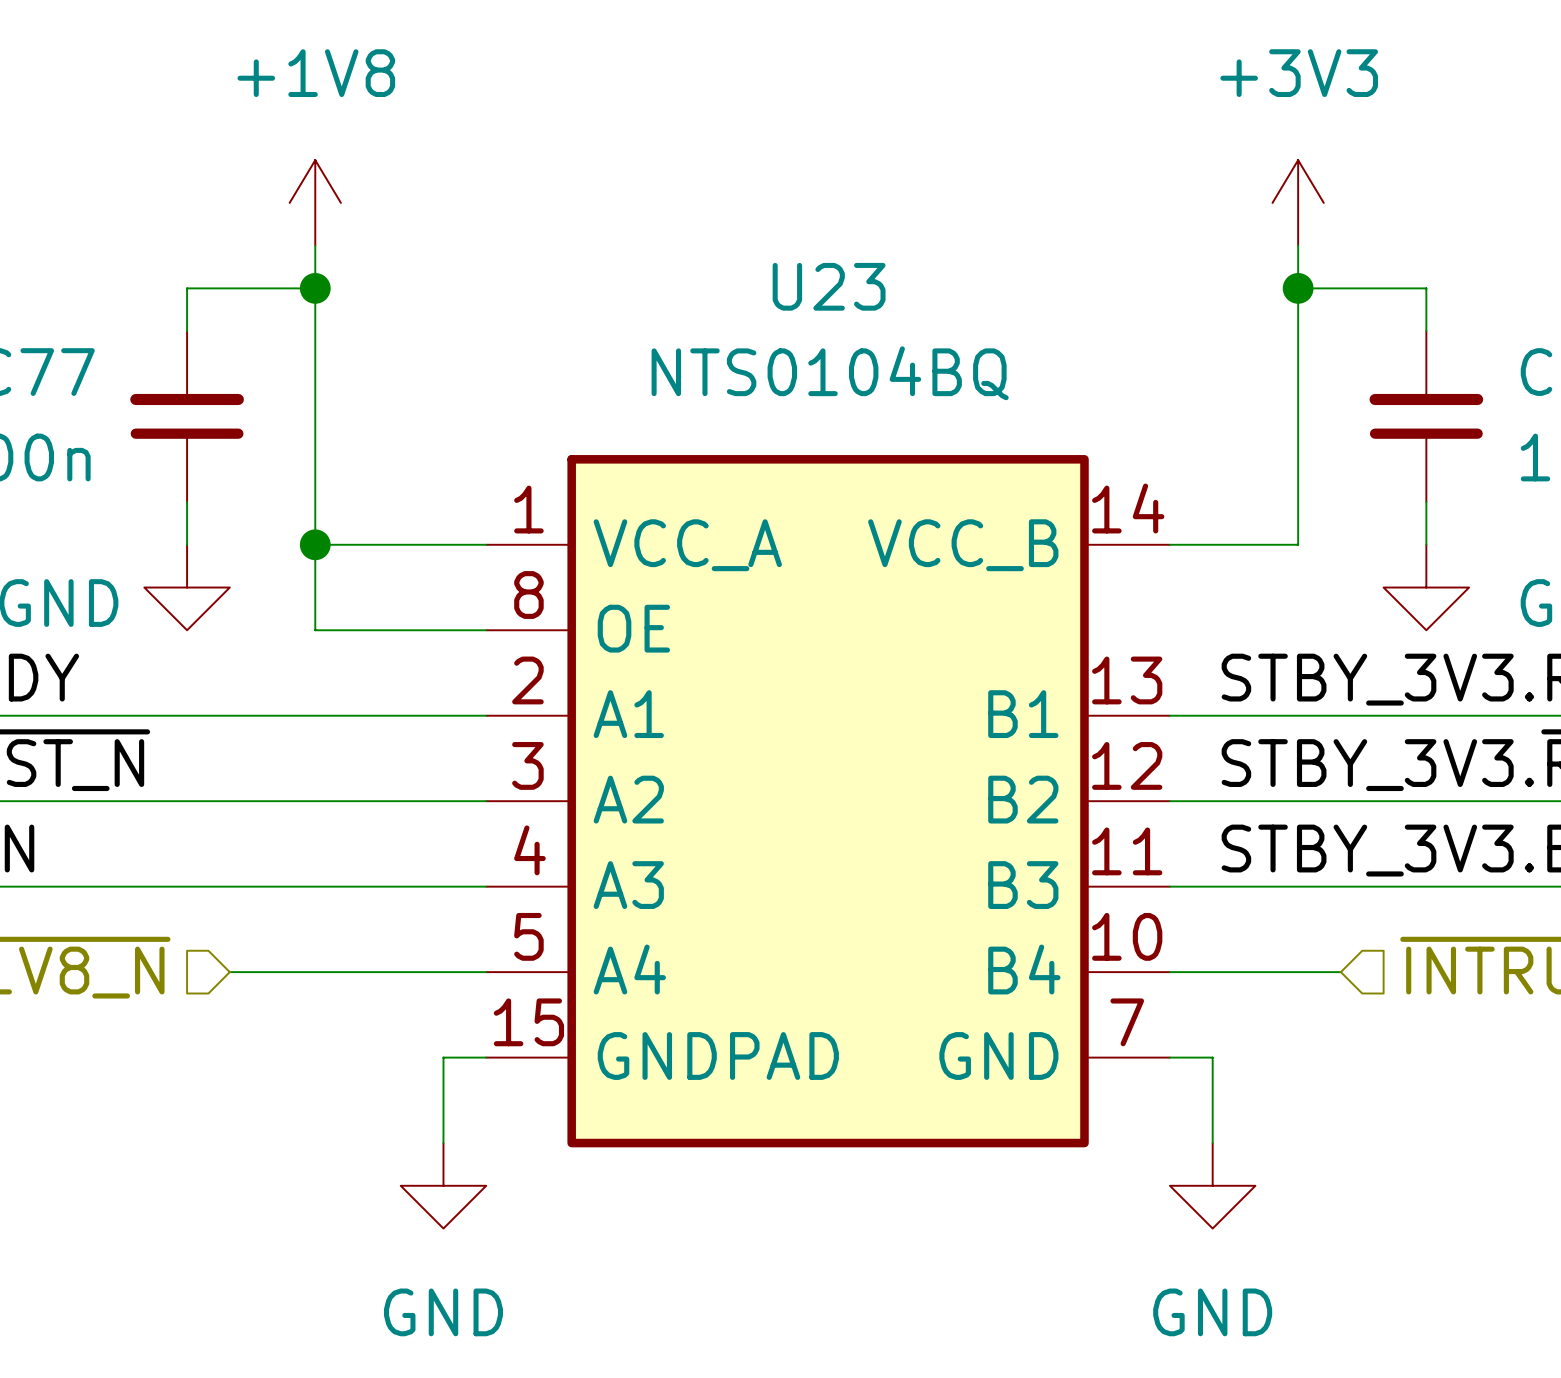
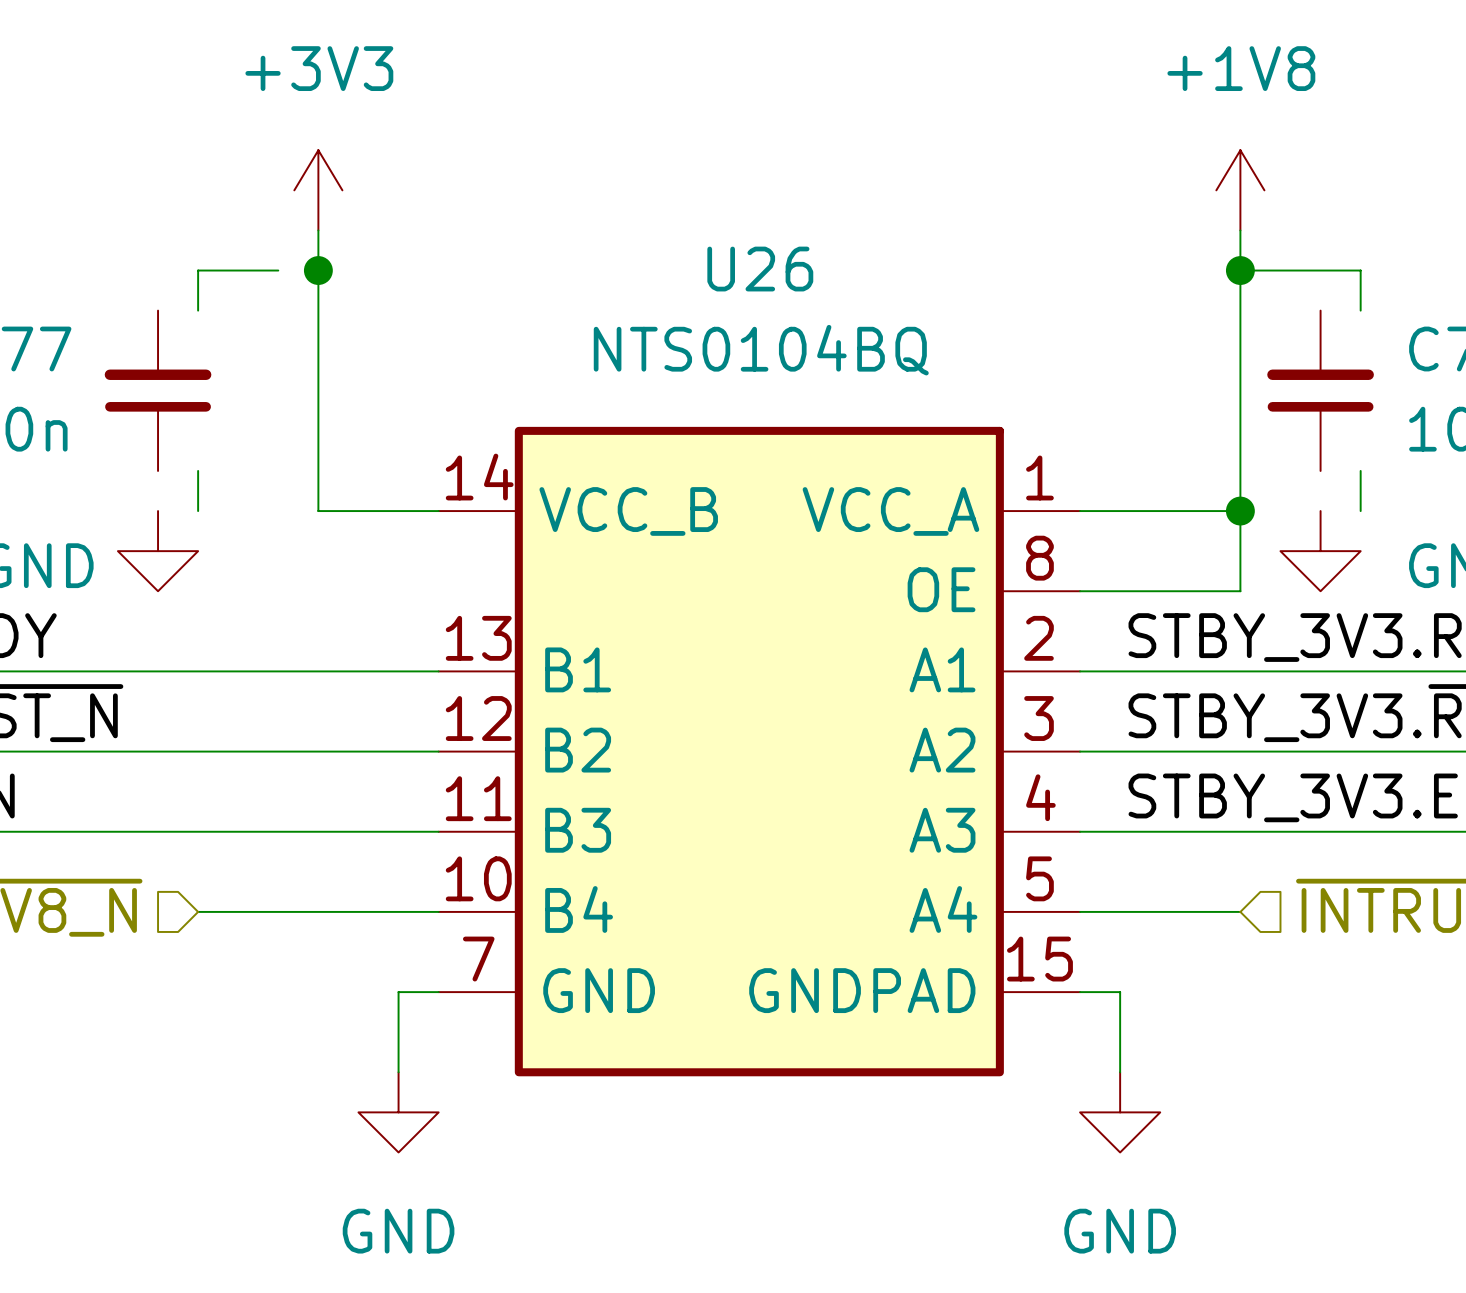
power symbol: +1V8 (315, 202) -> none
power symbol: none -> +3V3 (318, 190)
power symbol: +3V3 (1298, 202) -> none
power symbol: none -> +1V8 (1240, 190)
wire: (315, 245) (315, 630) (486, 630) -> none
wire: (1298, 245) (1298, 544) -> (1240, 511) (1200, 511)
wire: none -> (1240, 230) (1240, 591) (1080, 591)
wire: (229, 288) (187, 288) (187, 331) -> (198, 270) (198, 310)
junction position: (315, 288) -> (318, 270)
wire: (1298, 288) (1340, 288) -> none
junction position: (1298, 288) -> (1240, 270)
wire: (1426, 288) (1426, 331) -> (1320, 270) (1360, 270) (1360, 310)
wire: (187, 502) (187, 544) -> (198, 470) (198, 511)
wire: (1426, 502) (1426, 544) -> (1360, 470) (1360, 511)
wire: (315, 544) (358, 544) -> (318, 230) (318, 511)
junction: (315, 544) -> none
junction: none -> (1240, 511)
U23: (828, 801) -> none
U26: none -> (759, 751)

